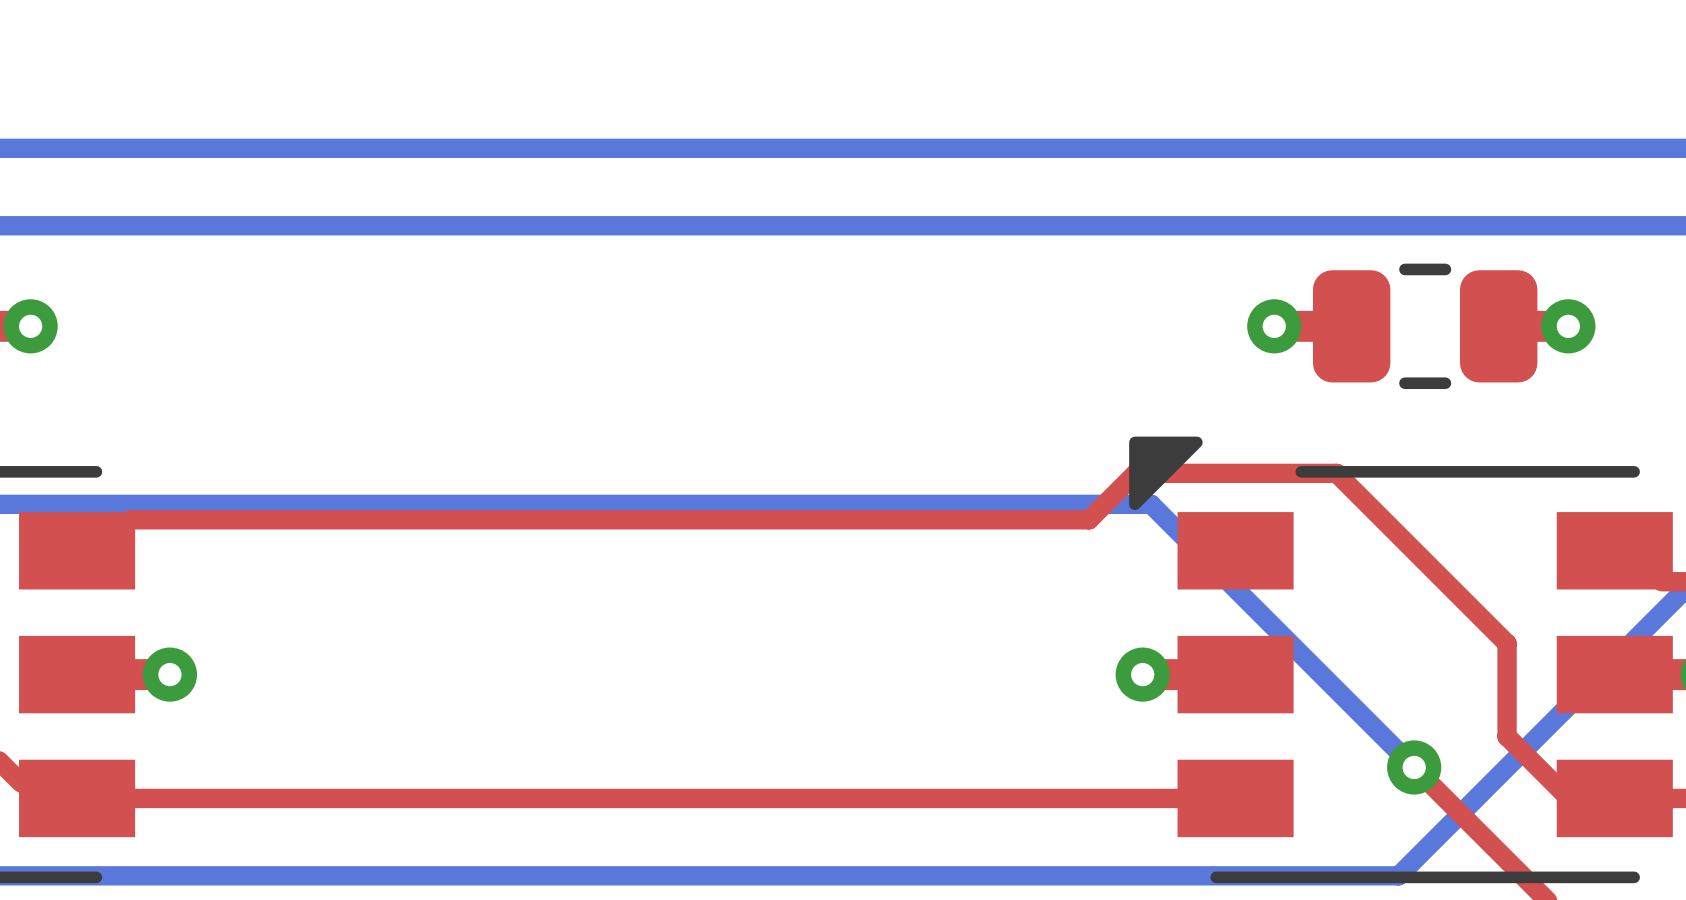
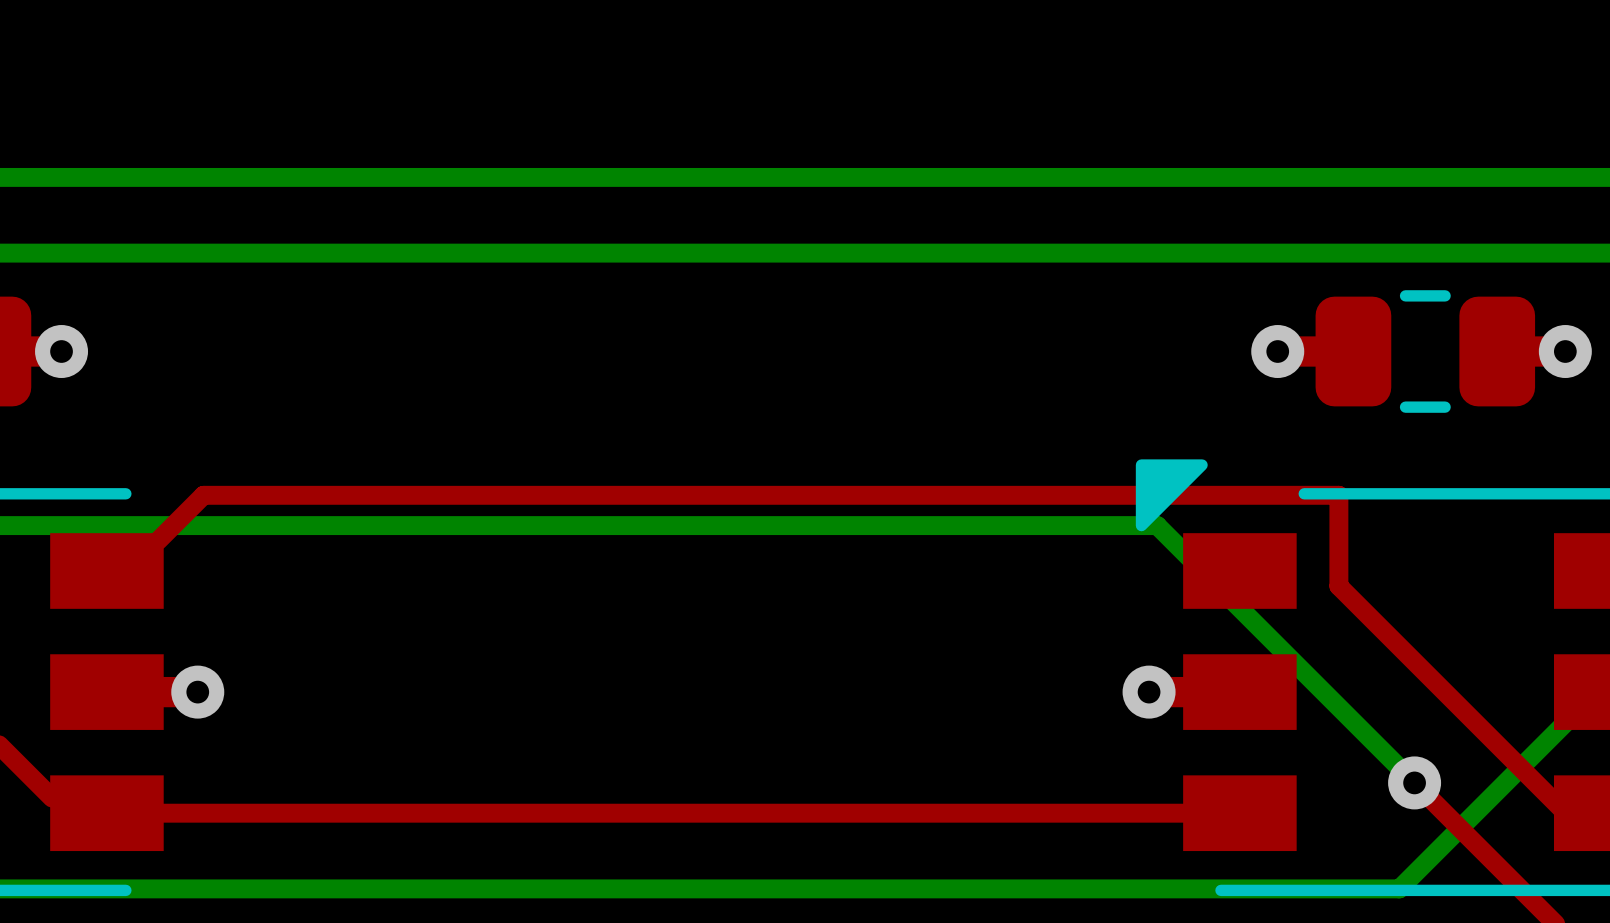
top track: (1135, 473) (1089, 519) (129, 519) -> (1142, 495) (203, 495) (158, 540)
top track: (1336, 473) (1507, 643) (1507, 736) -> (1338, 495) (1338, 586) (1505, 752)

